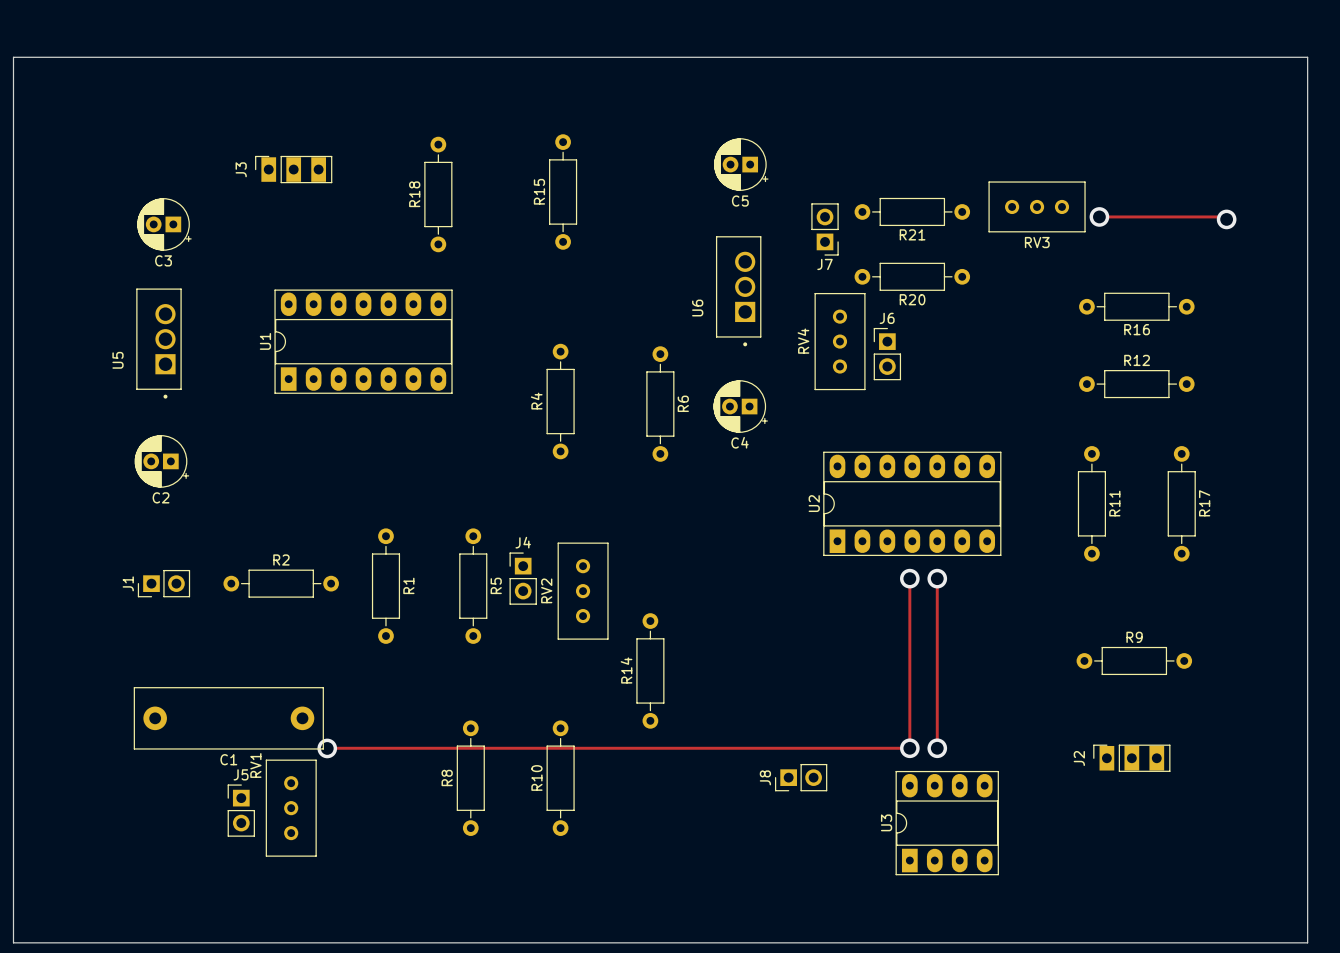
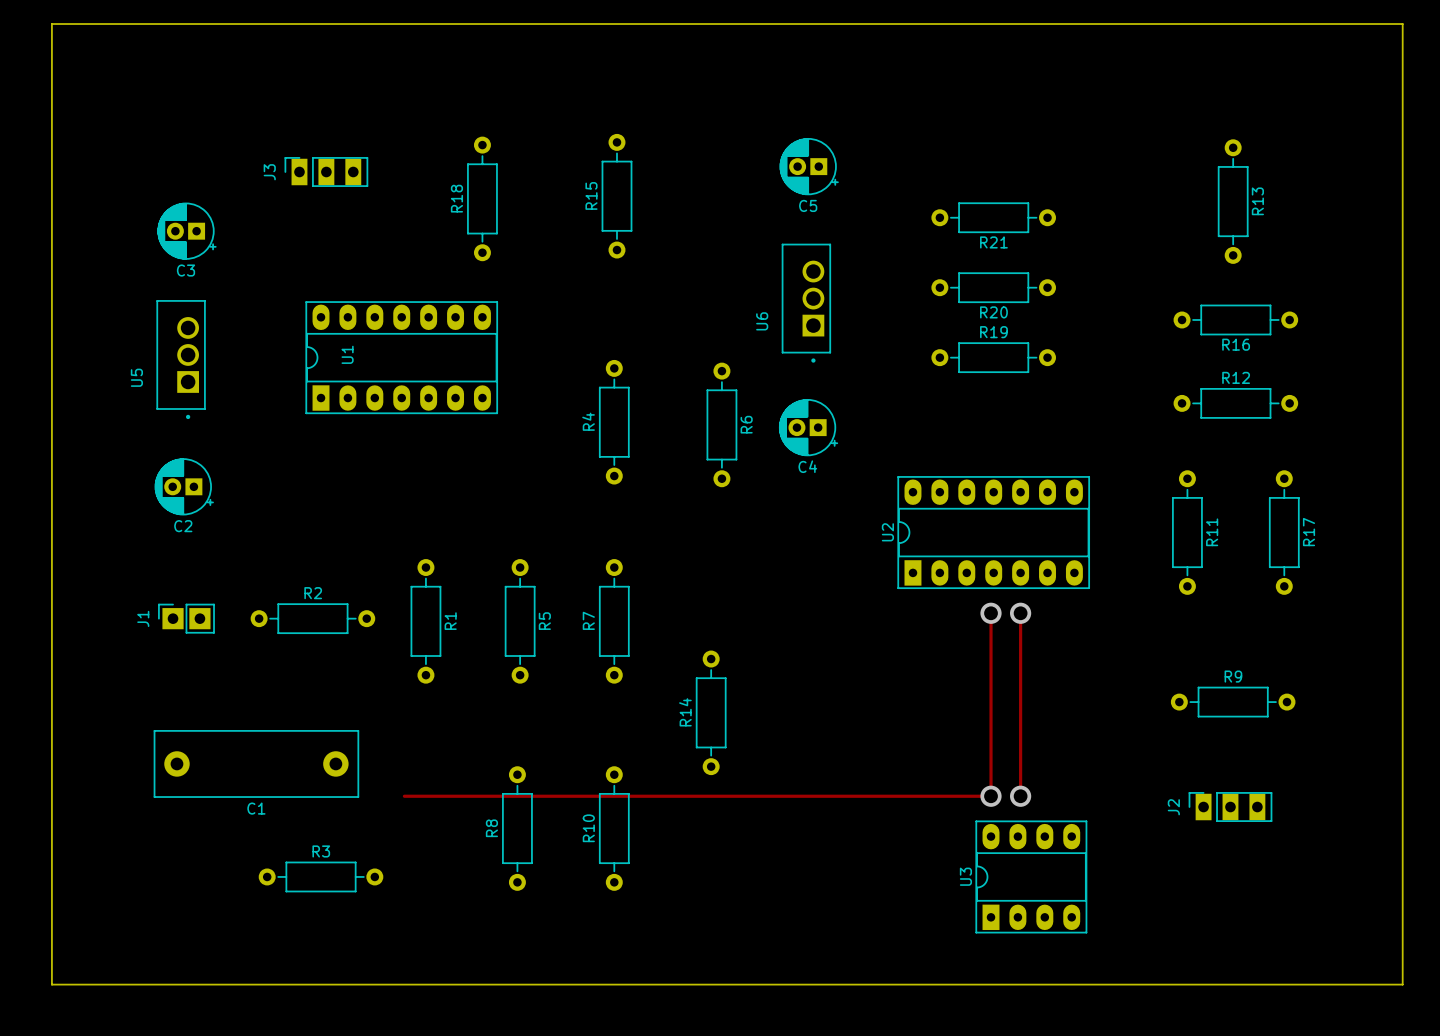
board edge: (13, 57) (1307, 57) (1307, 942) (13, 942) (13, 57) -> (51, 24) (51, 984) (1402, 984) (1402, 24) (51, 24)
R13: none -> (1233, 201)
RV3: (1037, 206) -> none
track: (1099, 216) (1224, 216) (1226, 219) -> none
via: (1099, 216) -> none
via: (1226, 219) -> none
J7: (825, 229) -> none
U1 name position: U1 (265, 341) -> U1 (347, 354)
RV4: (840, 341) -> none
R19: none -> (993, 357)
J6: (887, 354) -> none
J1 footprint: [137, 569, 191, 598] -> [158, 603, 215, 634]
J4: (523, 578) -> none
R7: none -> (614, 621)
RV2: (583, 591) -> none
via: (327, 748) -> none
track: (366, 748) (327, 748) -> none
J8: (801, 777) -> none
RV1: (291, 808) -> none
J5: (241, 810) -> none
R3: none -> (321, 876)

